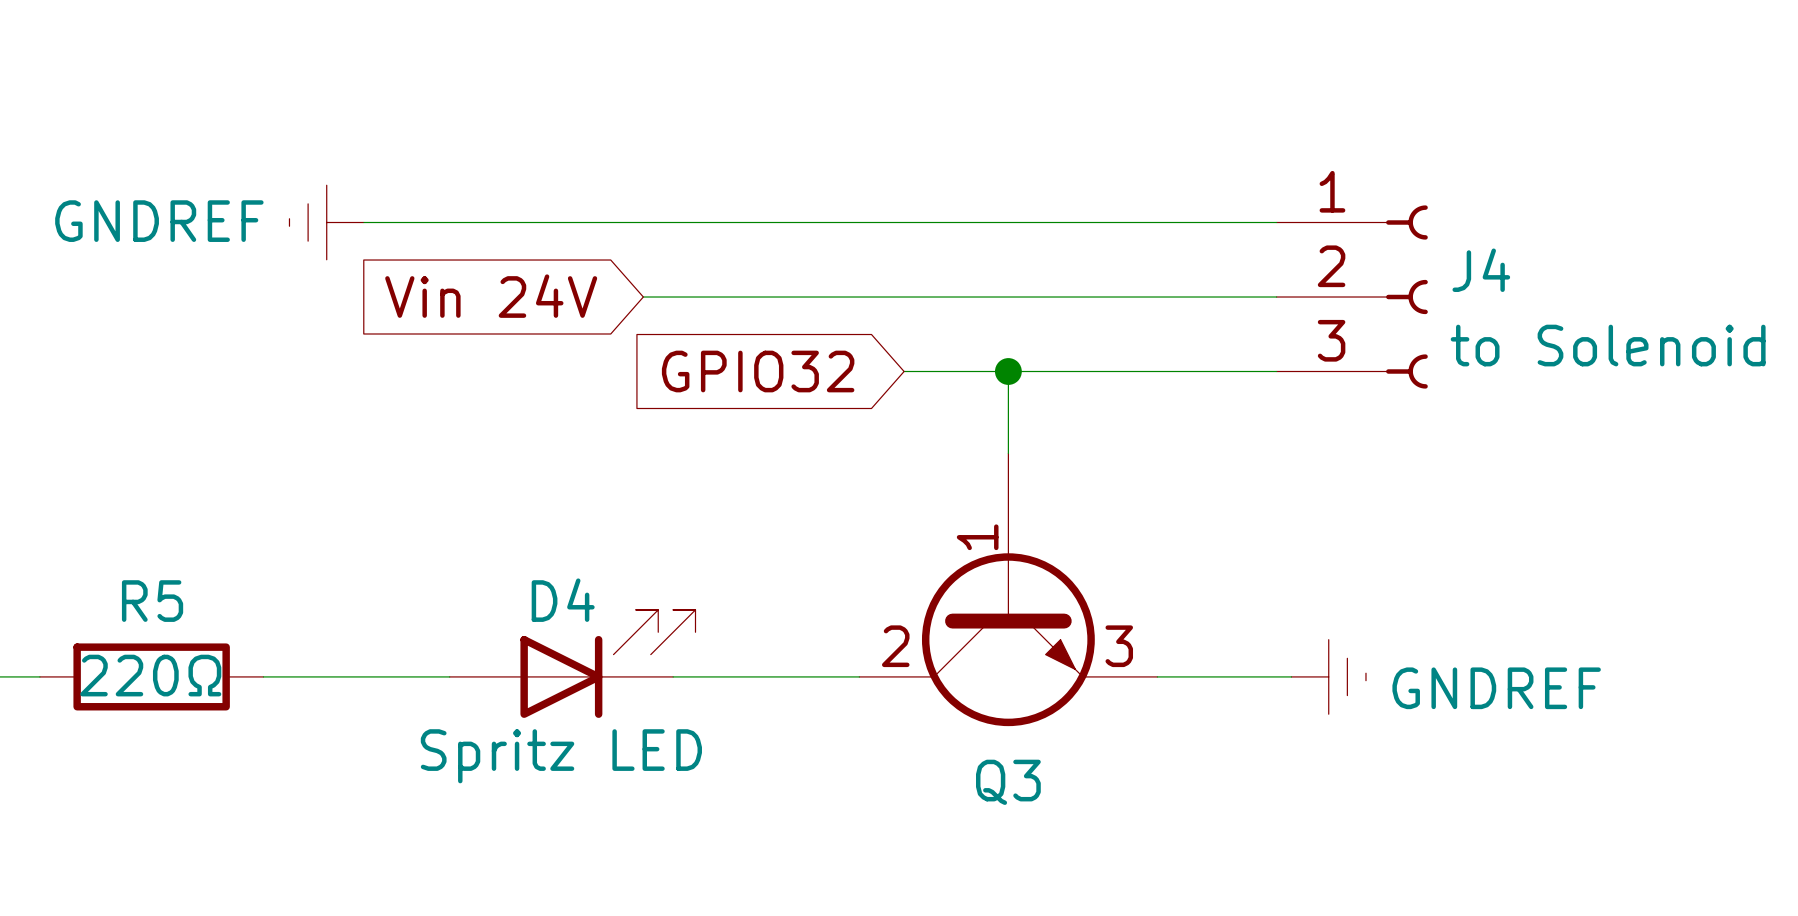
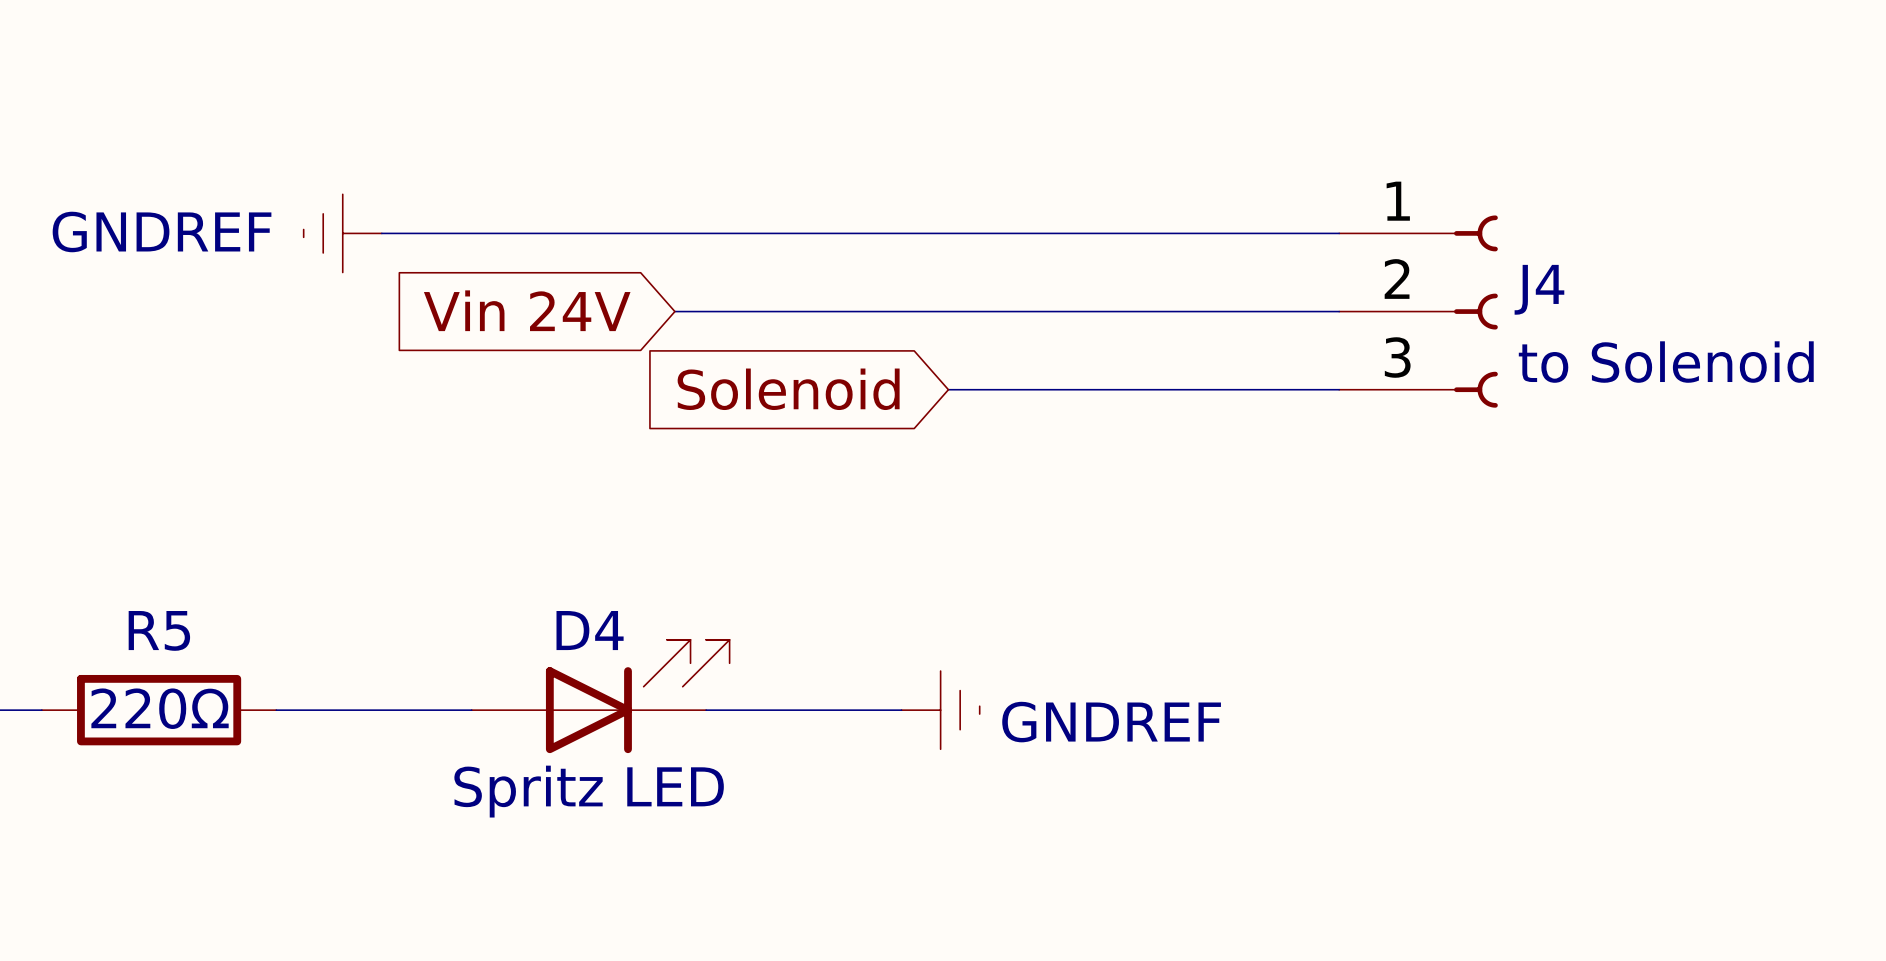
global label: GPIO32 (758, 371) -> Solenoid (788, 389)
wire: (1008, 371) (1008, 453) -> none
junction: (1008, 371) -> none
Q3: (1008, 589) -> none
wire: (1157, 676) (1291, 676) -> none
power symbol position: GNDREF (1328, 676) -> GNDREF (940, 710)

